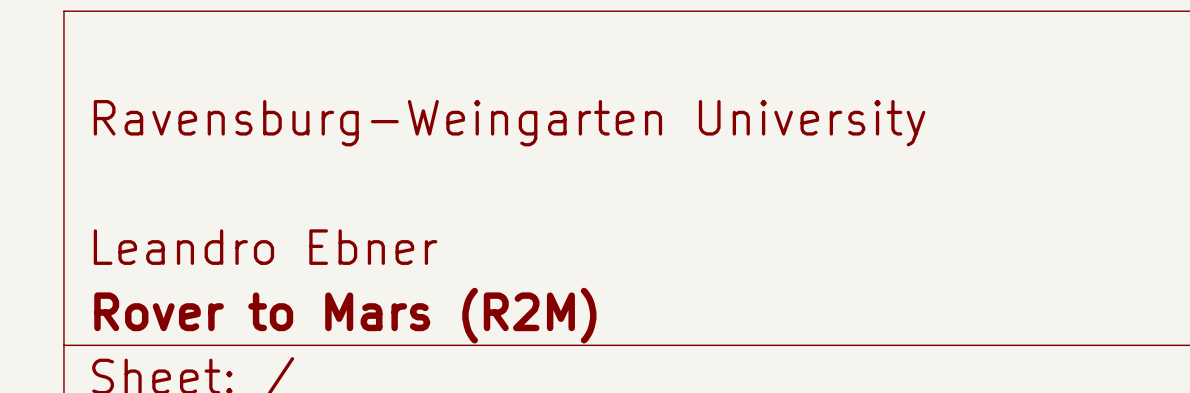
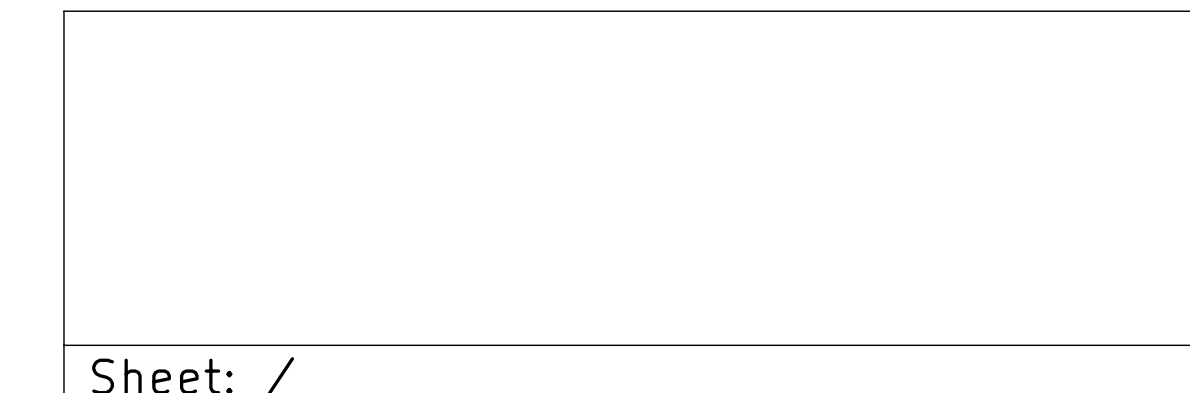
title block: Ravensburg-Weingarten University (509, 123) -> none
title block: Leandro Ebner (265, 247) -> none
title block: Rover to Mars (R2M) (345, 315) -> none

